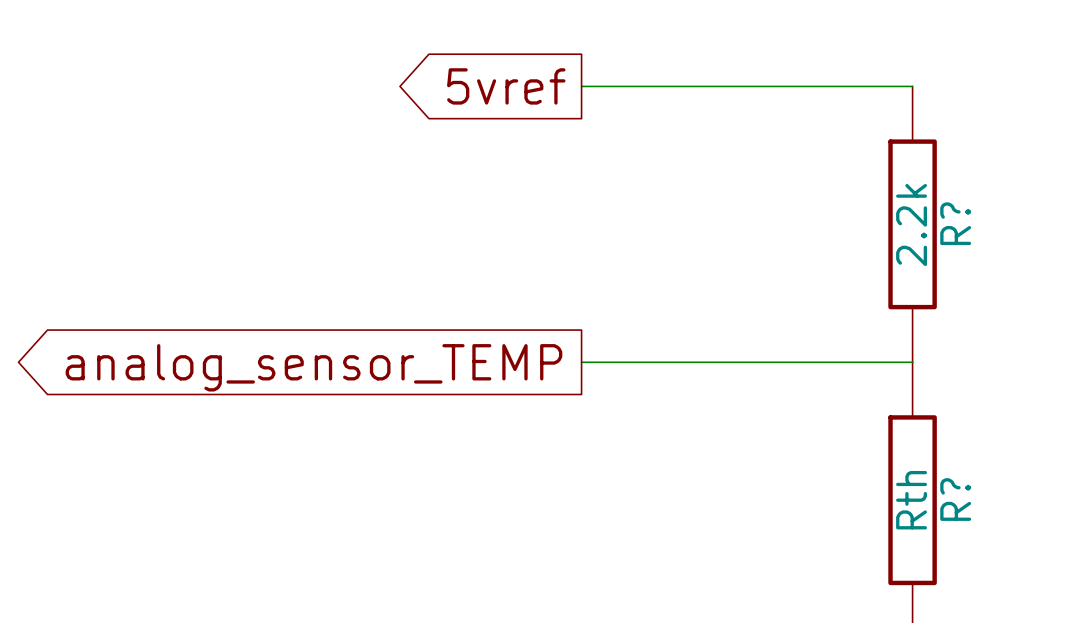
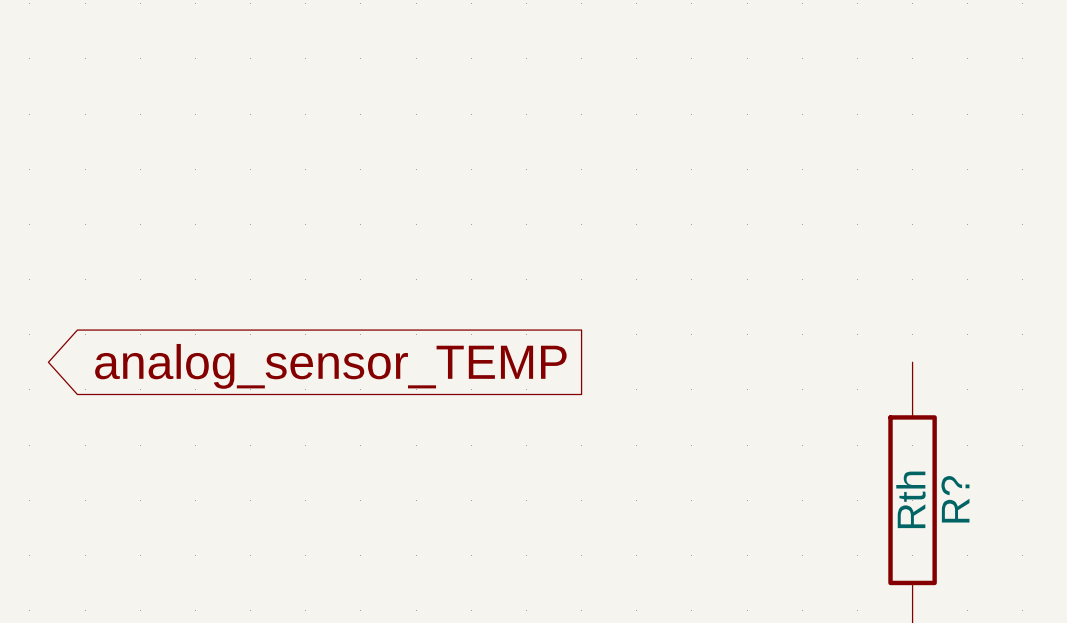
global label: 5vref (506, 86) -> none
wire: (581, 86) (912, 86) -> none
R?: 2.2k (912, 224) -> none
wire: (581, 362) (912, 362) -> none

